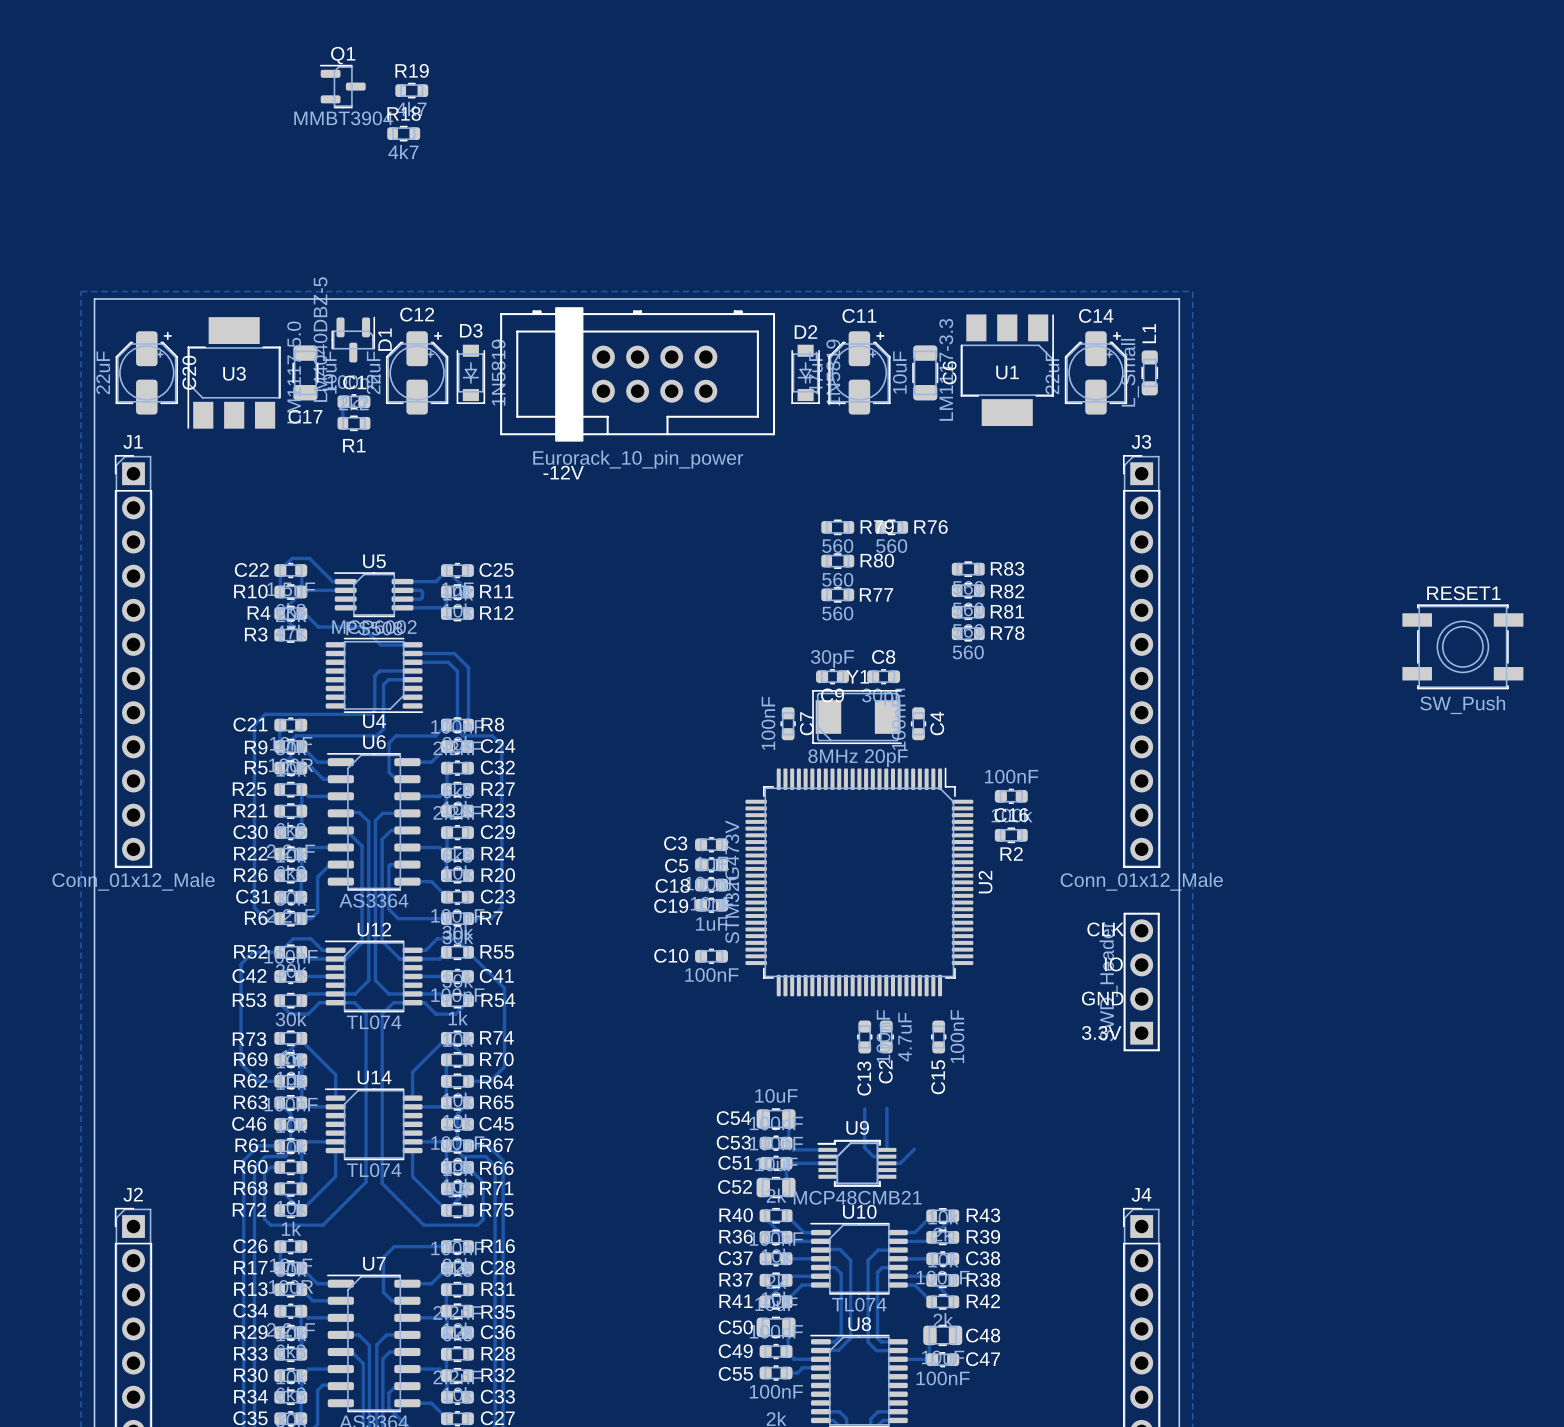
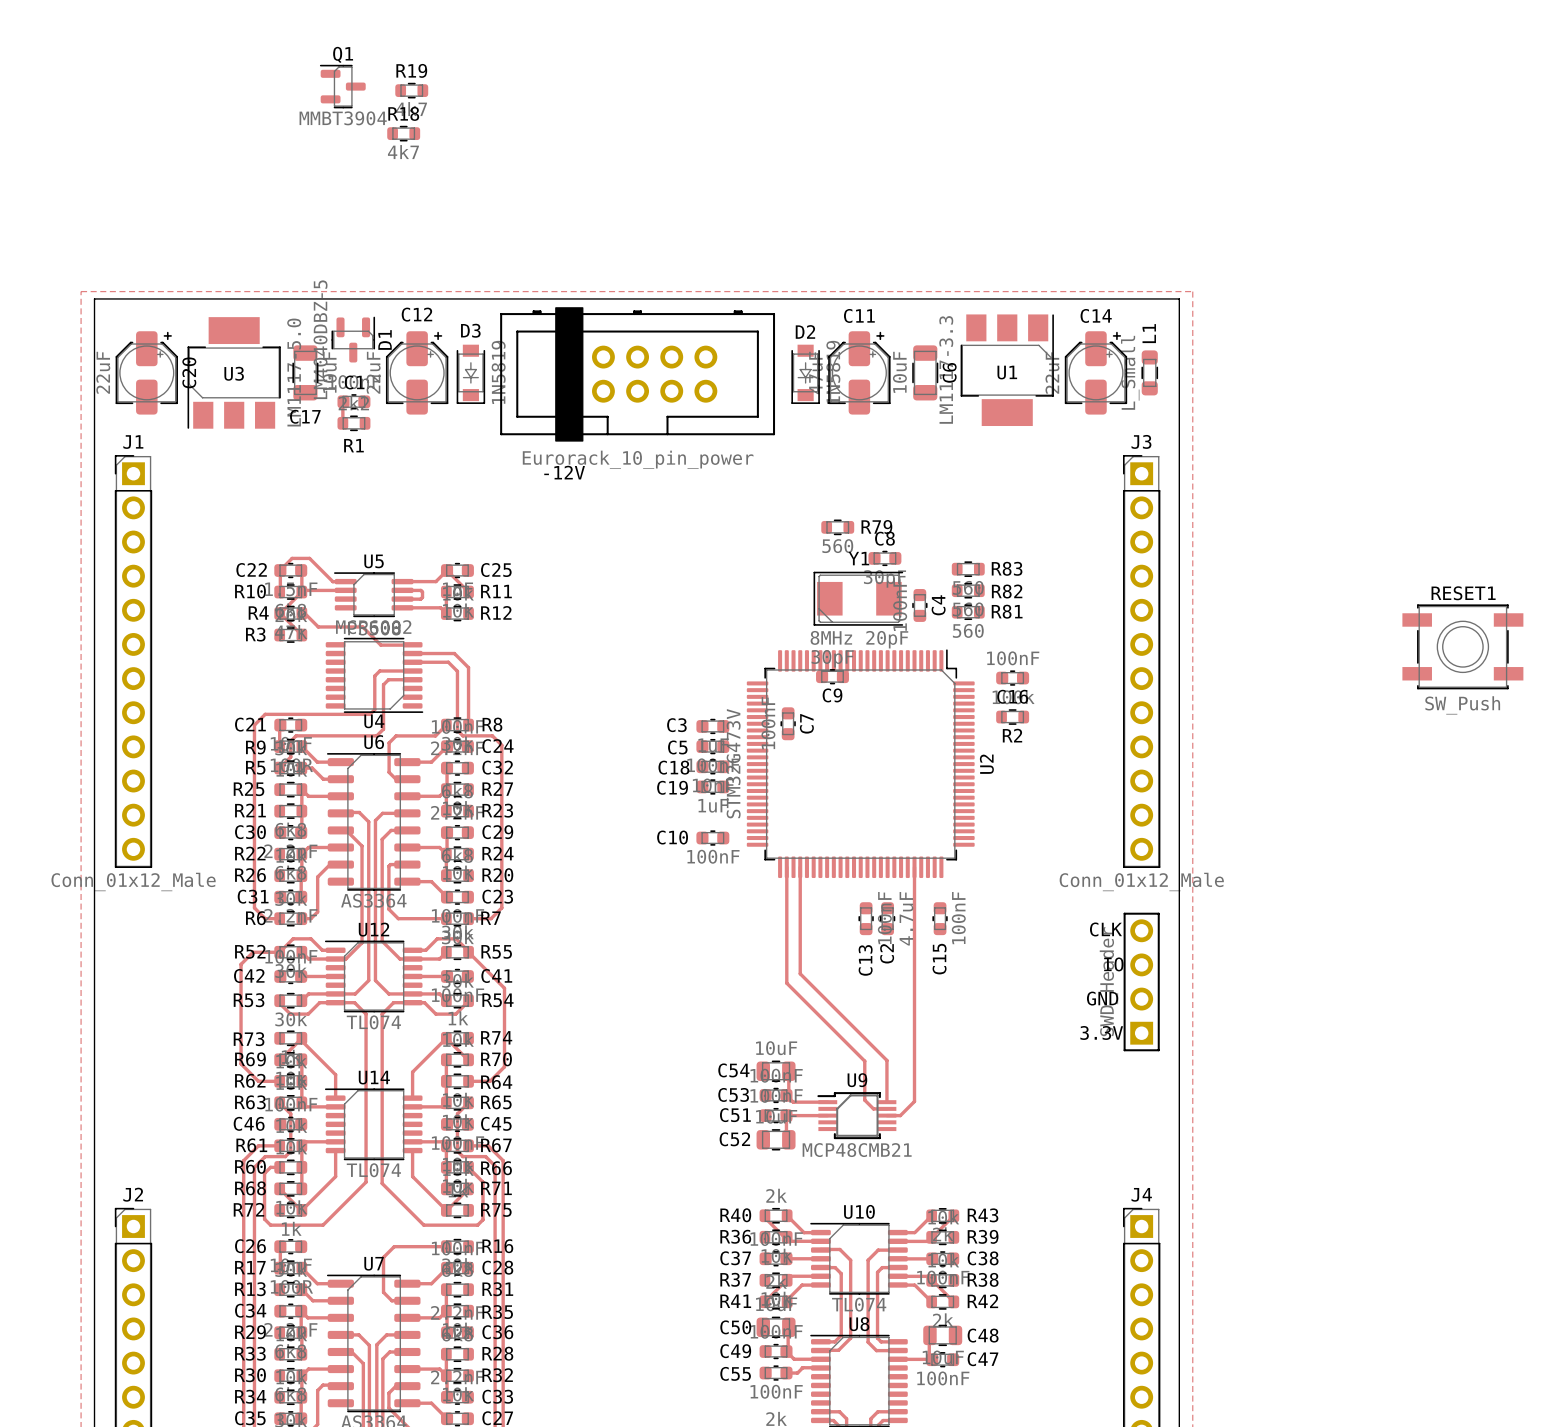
R76: 560 (891, 527) -> none
R80: 560 (837, 561) -> none
R77: 560 (837, 594) -> none
R78: 560 (968, 633) -> none
C8 position: (883, 676) -> (884, 558)
Y1 position: (857, 717) -> (858, 598)
C4 position: (918, 723) -> (919, 605)
C16 position: (1011, 796) -> (1012, 678)
R2 position: (1011, 835) -> (1012, 717)
C3 position: (711, 844) -> (712, 726)
C5 position: (711, 864) -> (712, 746)
track: none -> (786, 867) (786, 983) (864, 1061) (864, 1100) (873, 1108) (886, 1108)
track: none -> (800, 867) (800, 973) (886, 1060) (886, 1102)
track: none -> (914, 867) (914, 1101) (900, 1115) (886, 1115)
U2 position: (859, 881) -> (860, 763)
C18 position: (711, 885) -> (712, 766)
C19 position: (711, 905) -> (712, 786)
C10 position: (711, 956) -> (712, 838)
C13 position: (864, 1036) -> (866, 918)
C2 position: (886, 1036) -> (887, 918)
C15 position: (938, 1036) -> (940, 918)
track: (864, 1108) (864, 1147) (873, 1156) (886, 1156) -> none
track: (886, 1108) (886, 1149) -> none
C54 position: (776, 1118) -> (776, 1071)
track: (788, 1118) (788, 1140) (786, 1143) (793, 1149) (827, 1149) -> (788, 1071) (788, 1093) (786, 1095) (793, 1102) (827, 1102)
C53 position: (776, 1143) -> (776, 1095)
track: (914, 1149) (900, 1163) (886, 1163) -> none
C51 position: (776, 1163) -> (776, 1115)
track: (827, 1163) (786, 1163) (786, 1185) (788, 1187) -> (827, 1115) (786, 1115) (786, 1137) (788, 1139)
U9 position: (856, 1163) -> (856, 1115)
C52 position: (776, 1187) -> (776, 1139)

